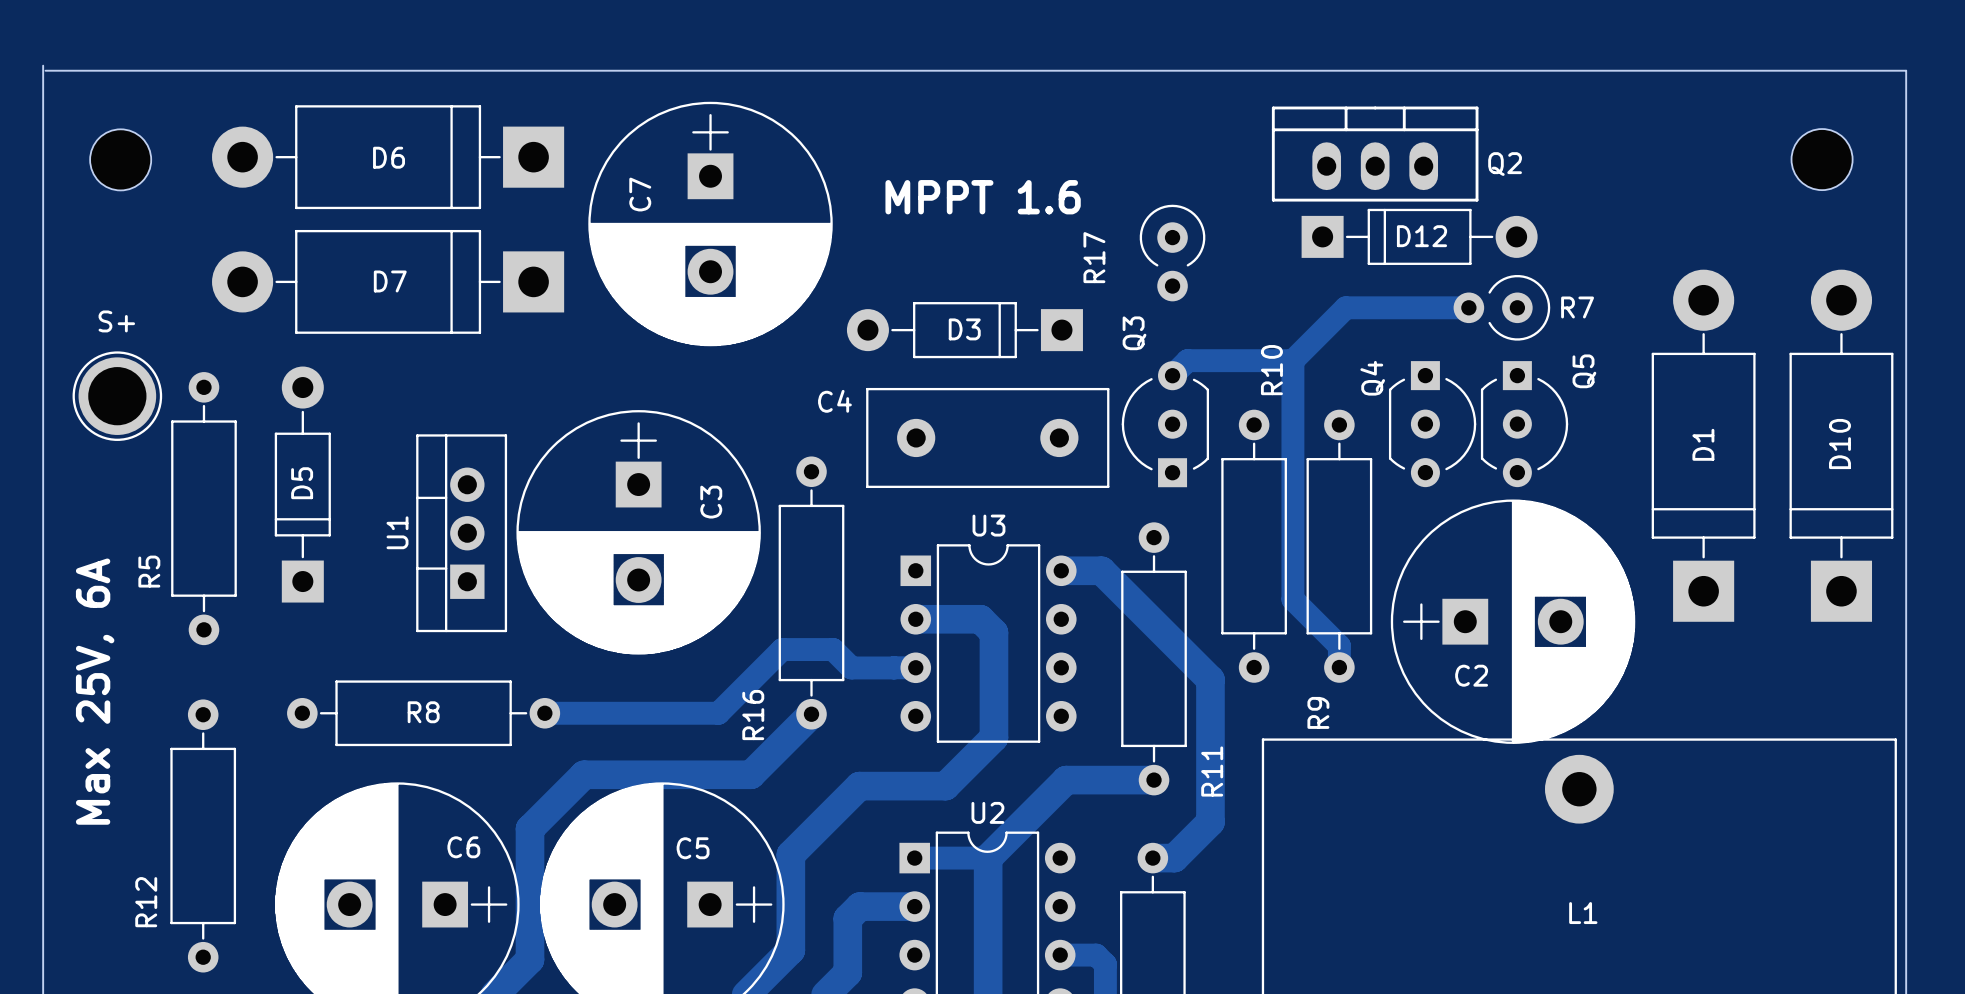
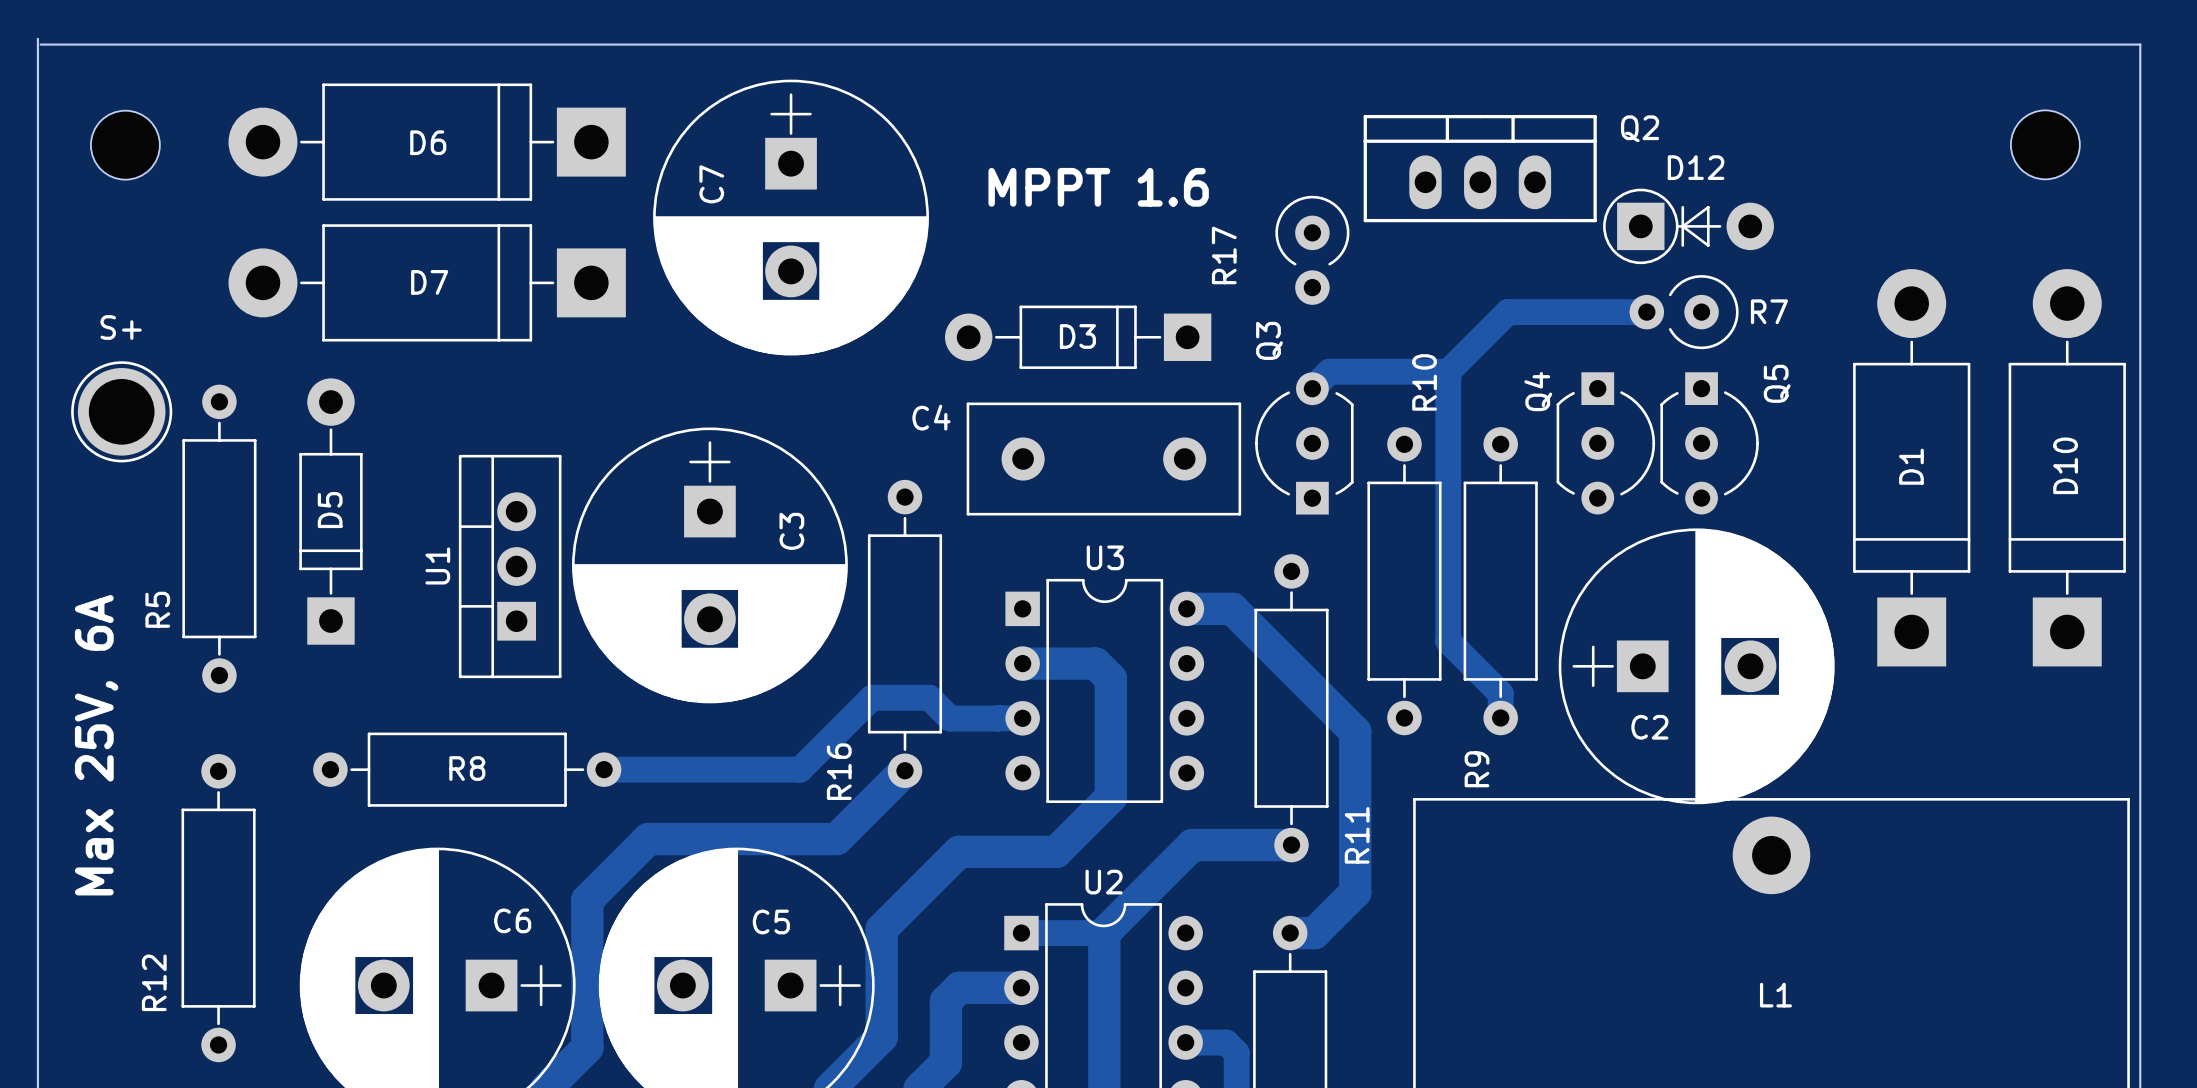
Q2 position: (1375, 154) -> (1480, 168)
Q2 name position: Q2 (1505, 164) -> Q2 (1640, 128)
D12 footprint: [1301, 208, 1538, 265] -> [1603, 188, 1774, 265]
D12 name position: D12 (1422, 236) -> D12 (1696, 167)

